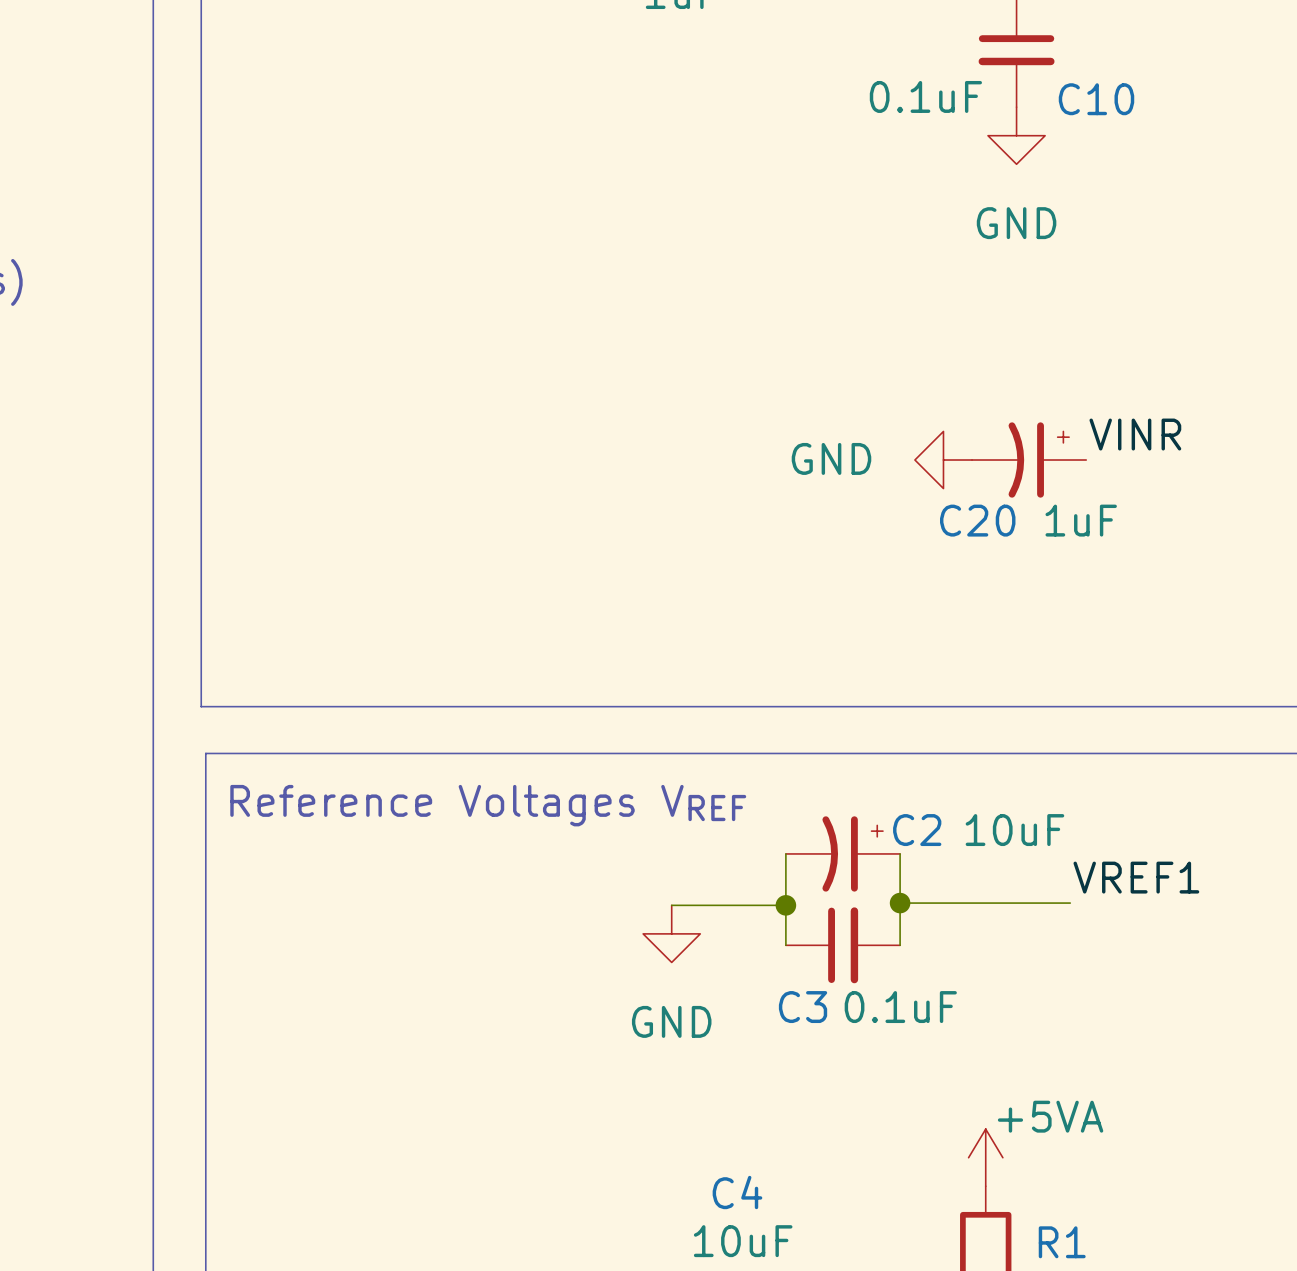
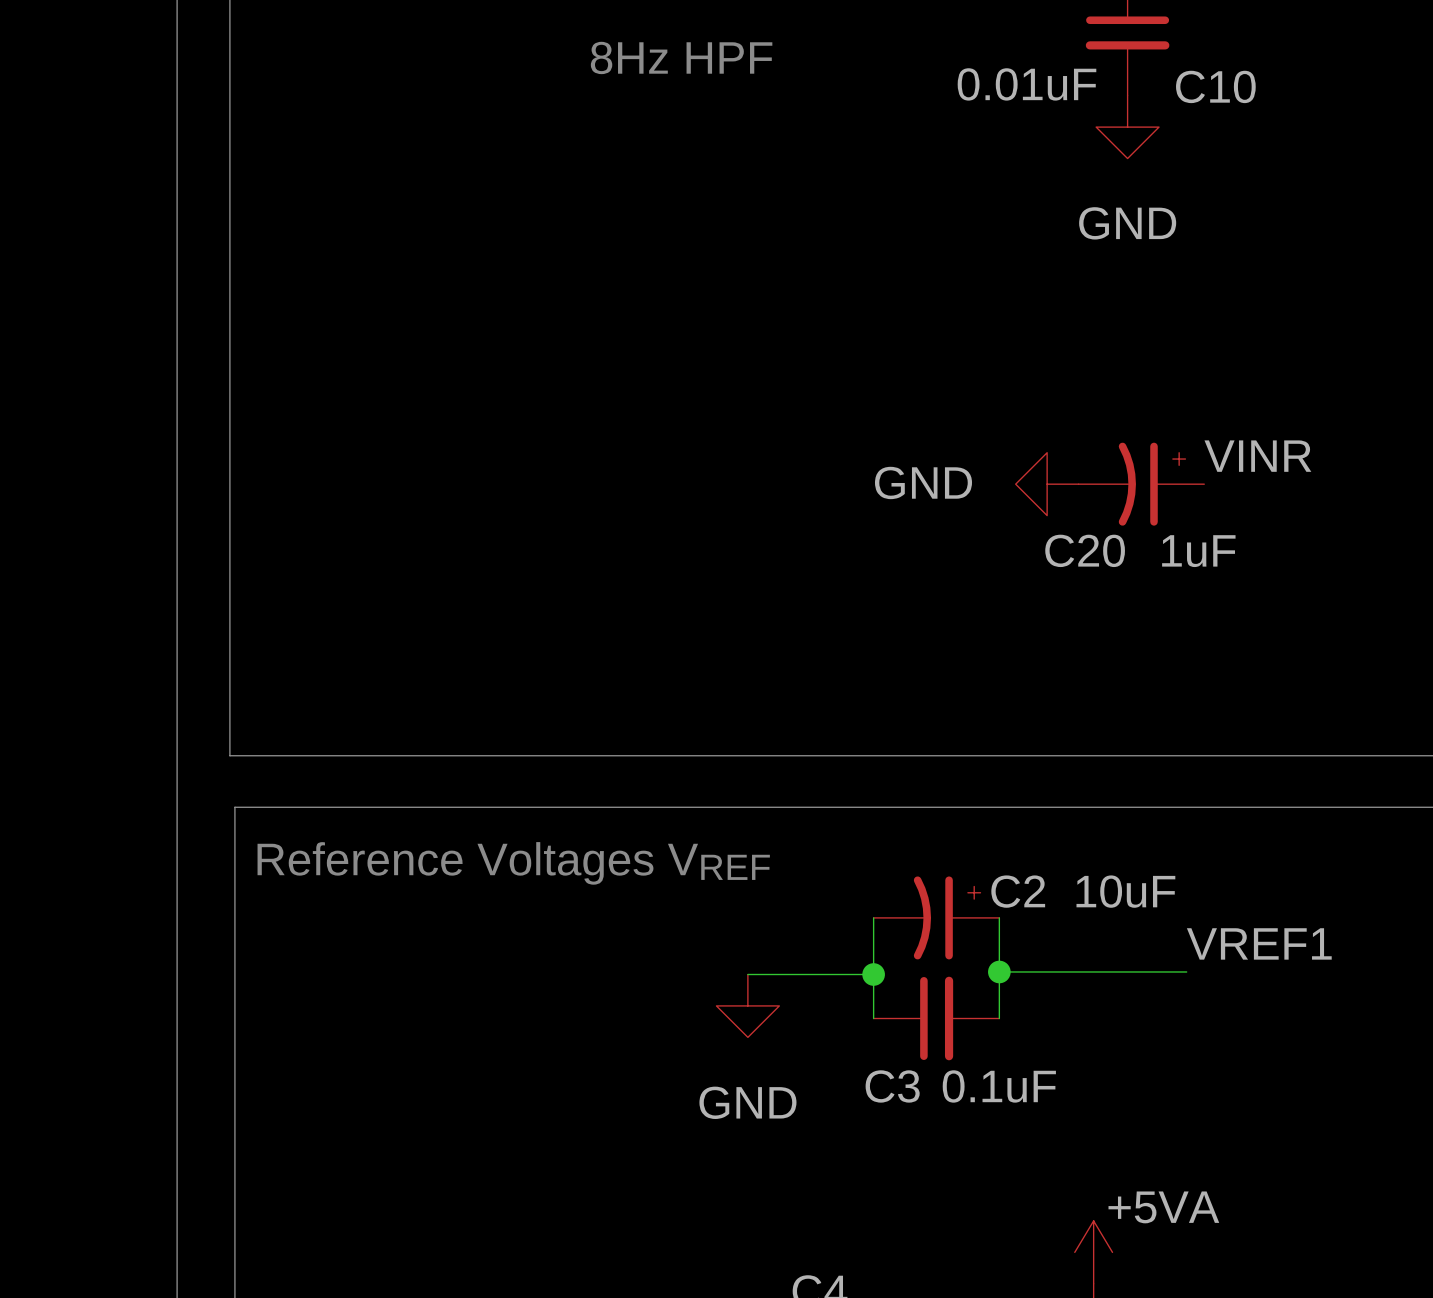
text: none -> 8Hz HPF (681, 57)
C10 value: 0.1uF (925, 96) -> 0.01uF (1026, 84)

